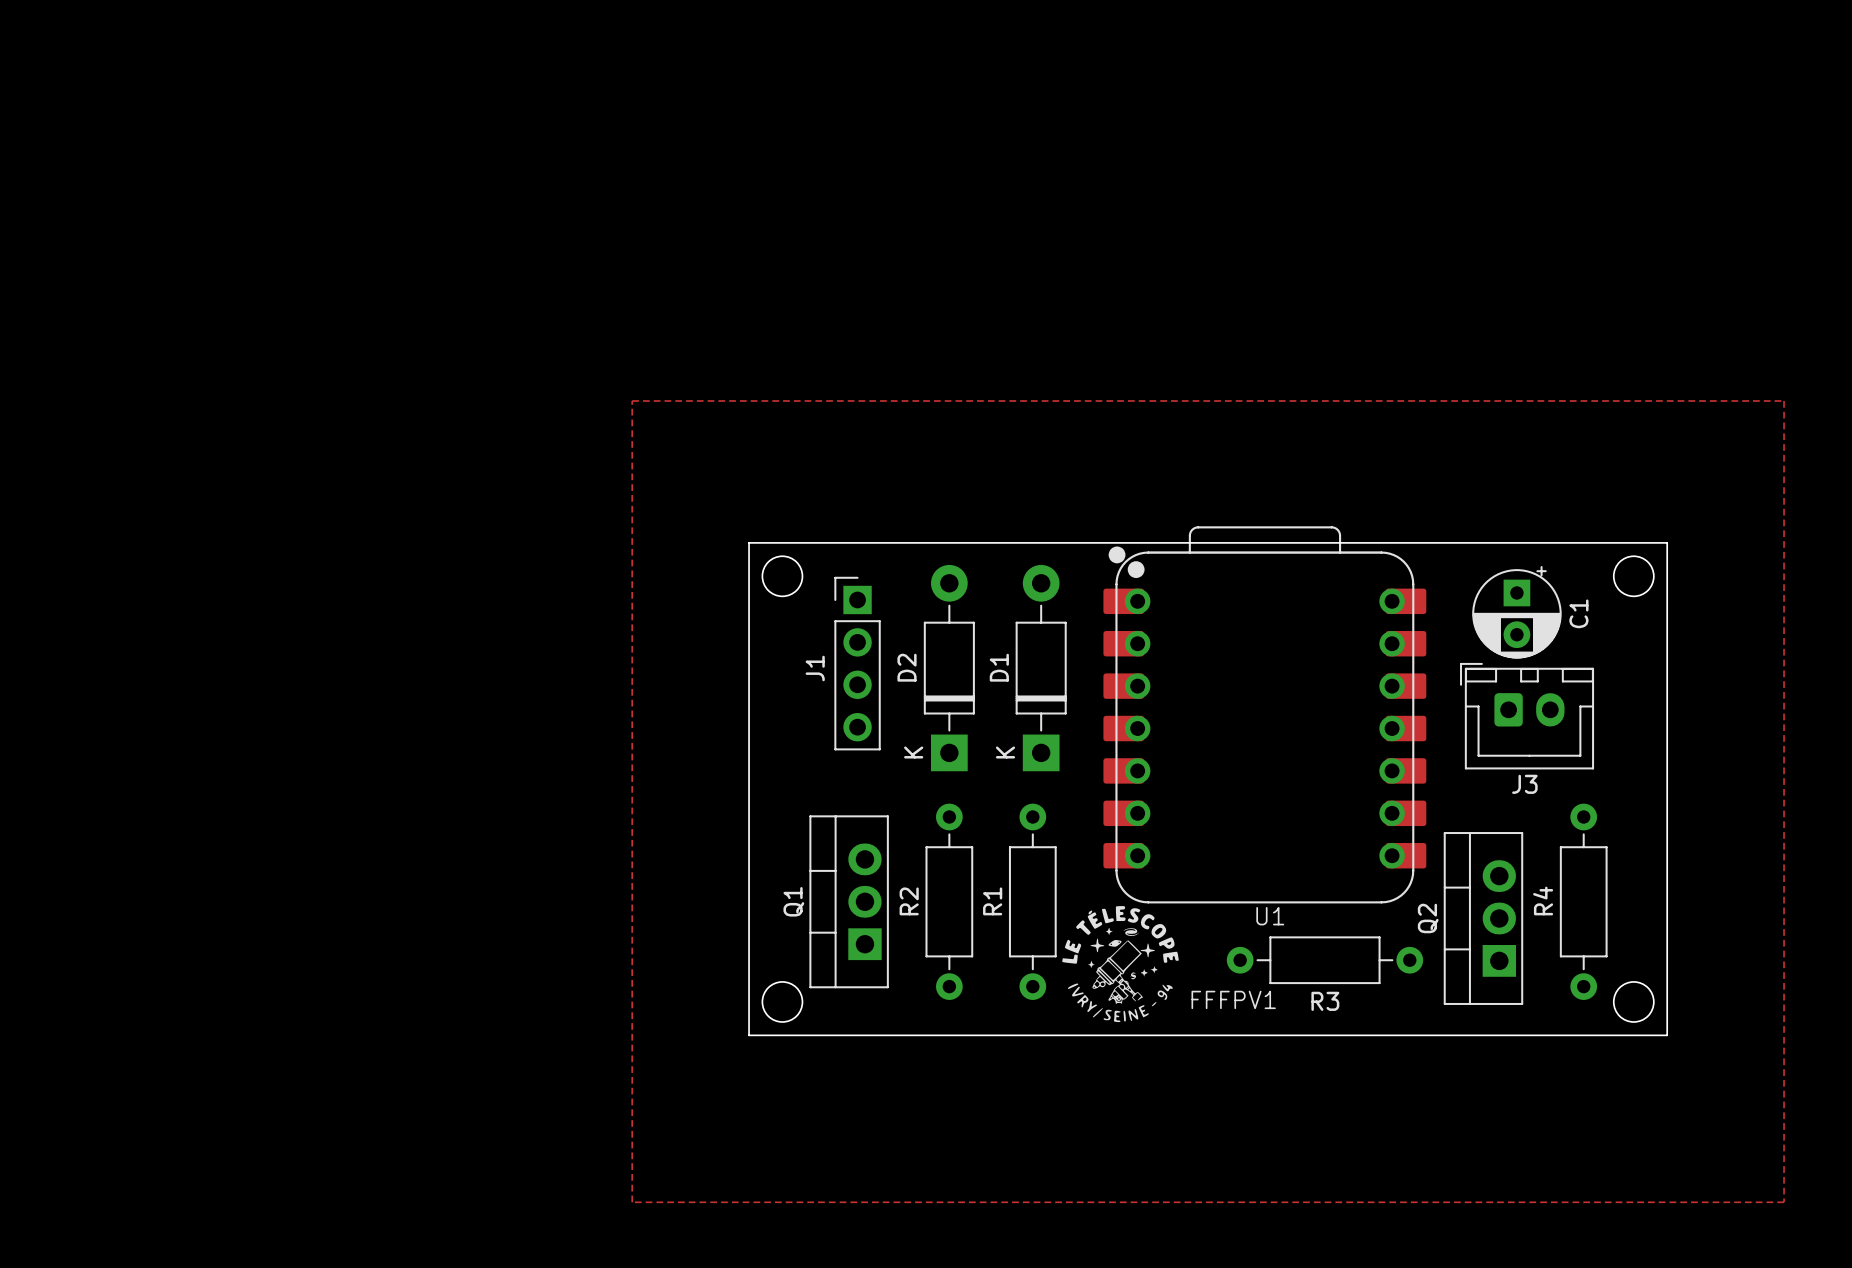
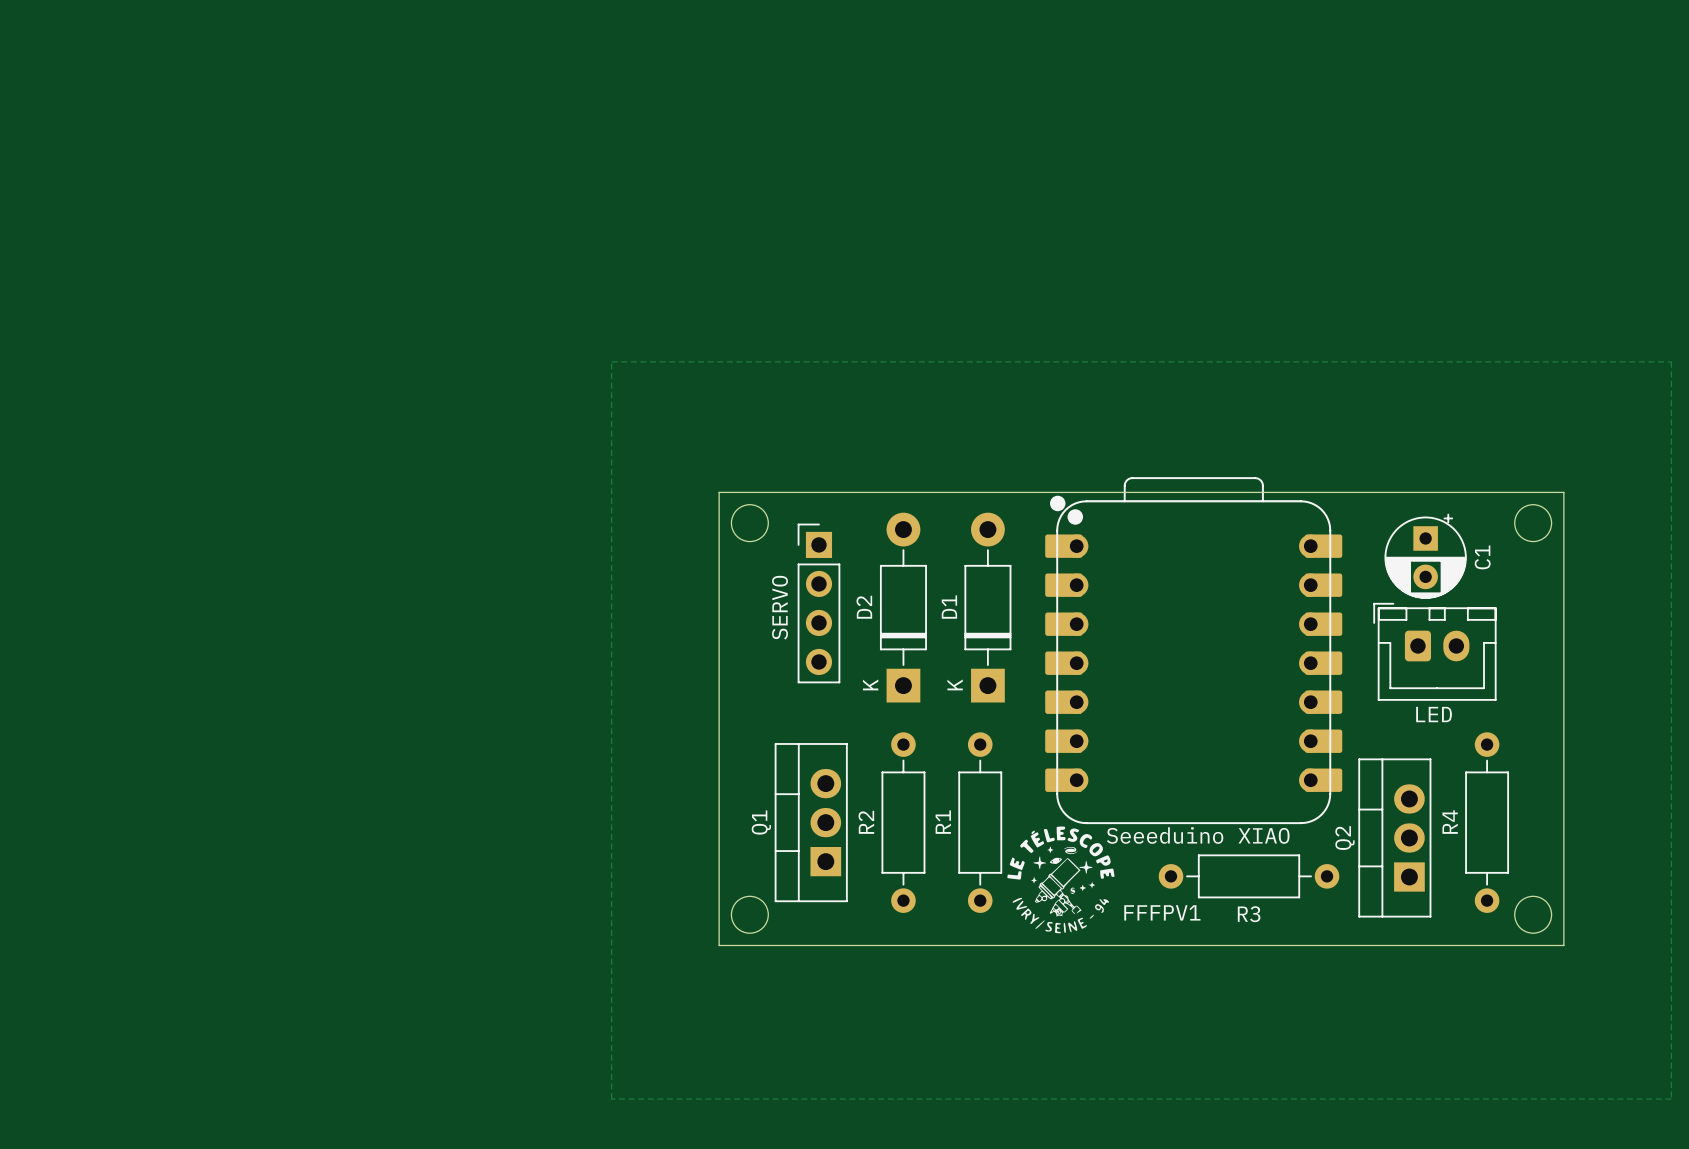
J1 name: J1 (815, 668) -> SERVO (780, 607)
J3 name: J3 (1524, 784) -> LED (1434, 714)
U1 name: U1 (1270, 916) -> Seeeduino XIAO (1198, 835)

